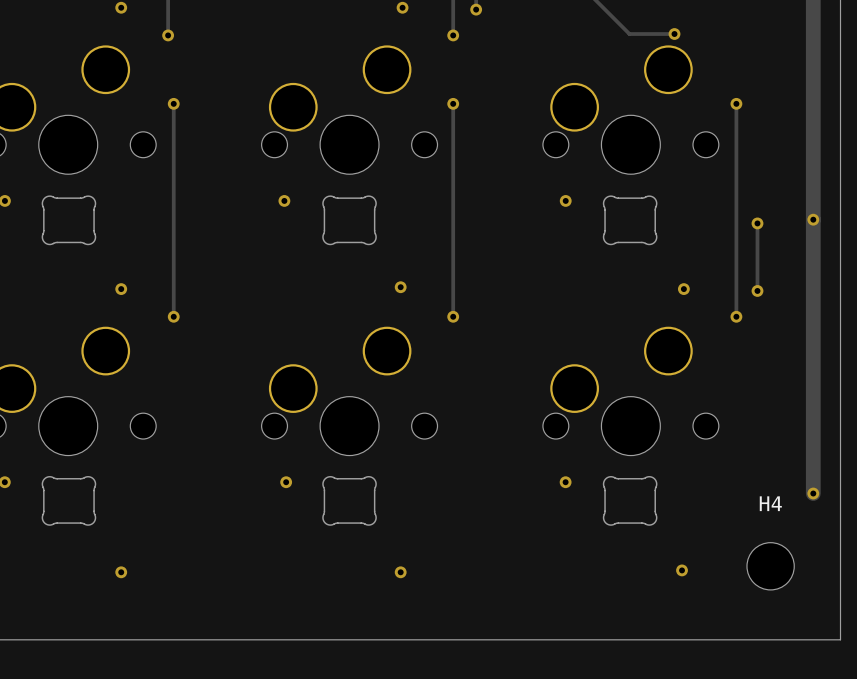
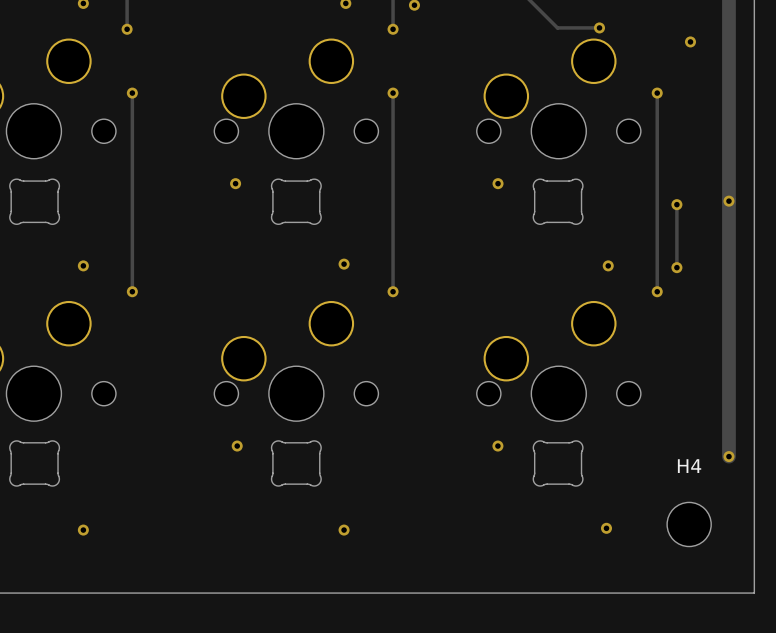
via: none -> (690, 41)

